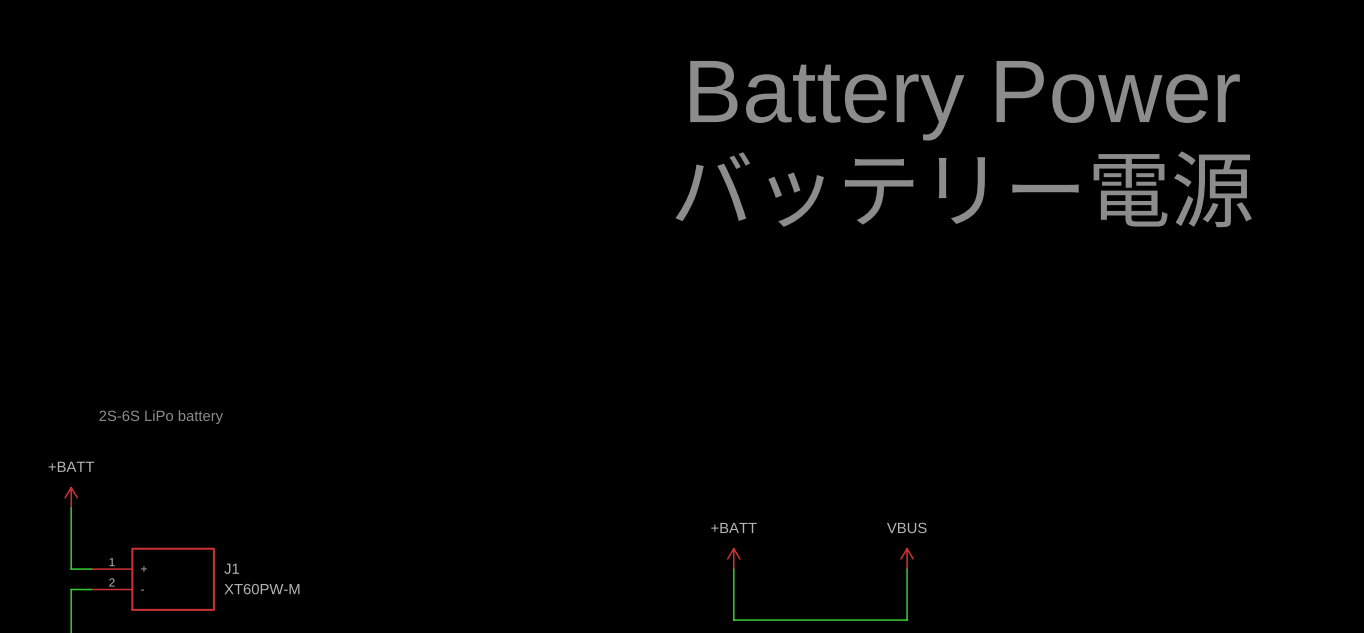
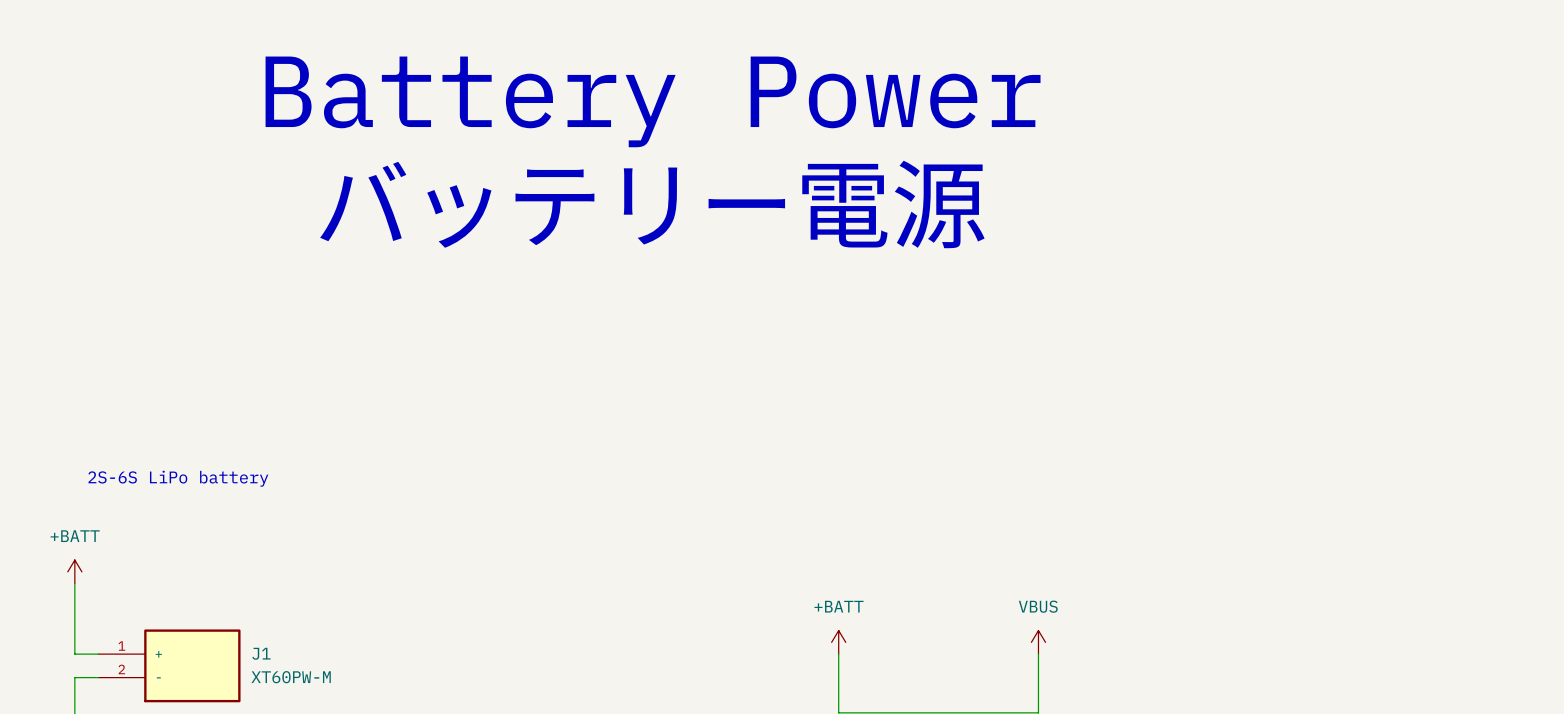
text: none -> Battery Power (653, 101)
text: Battery Power (965, 100) -> none
text: none -> バッテリー電源 (652, 204)
text: バッテリー電源 (963, 189) -> none

